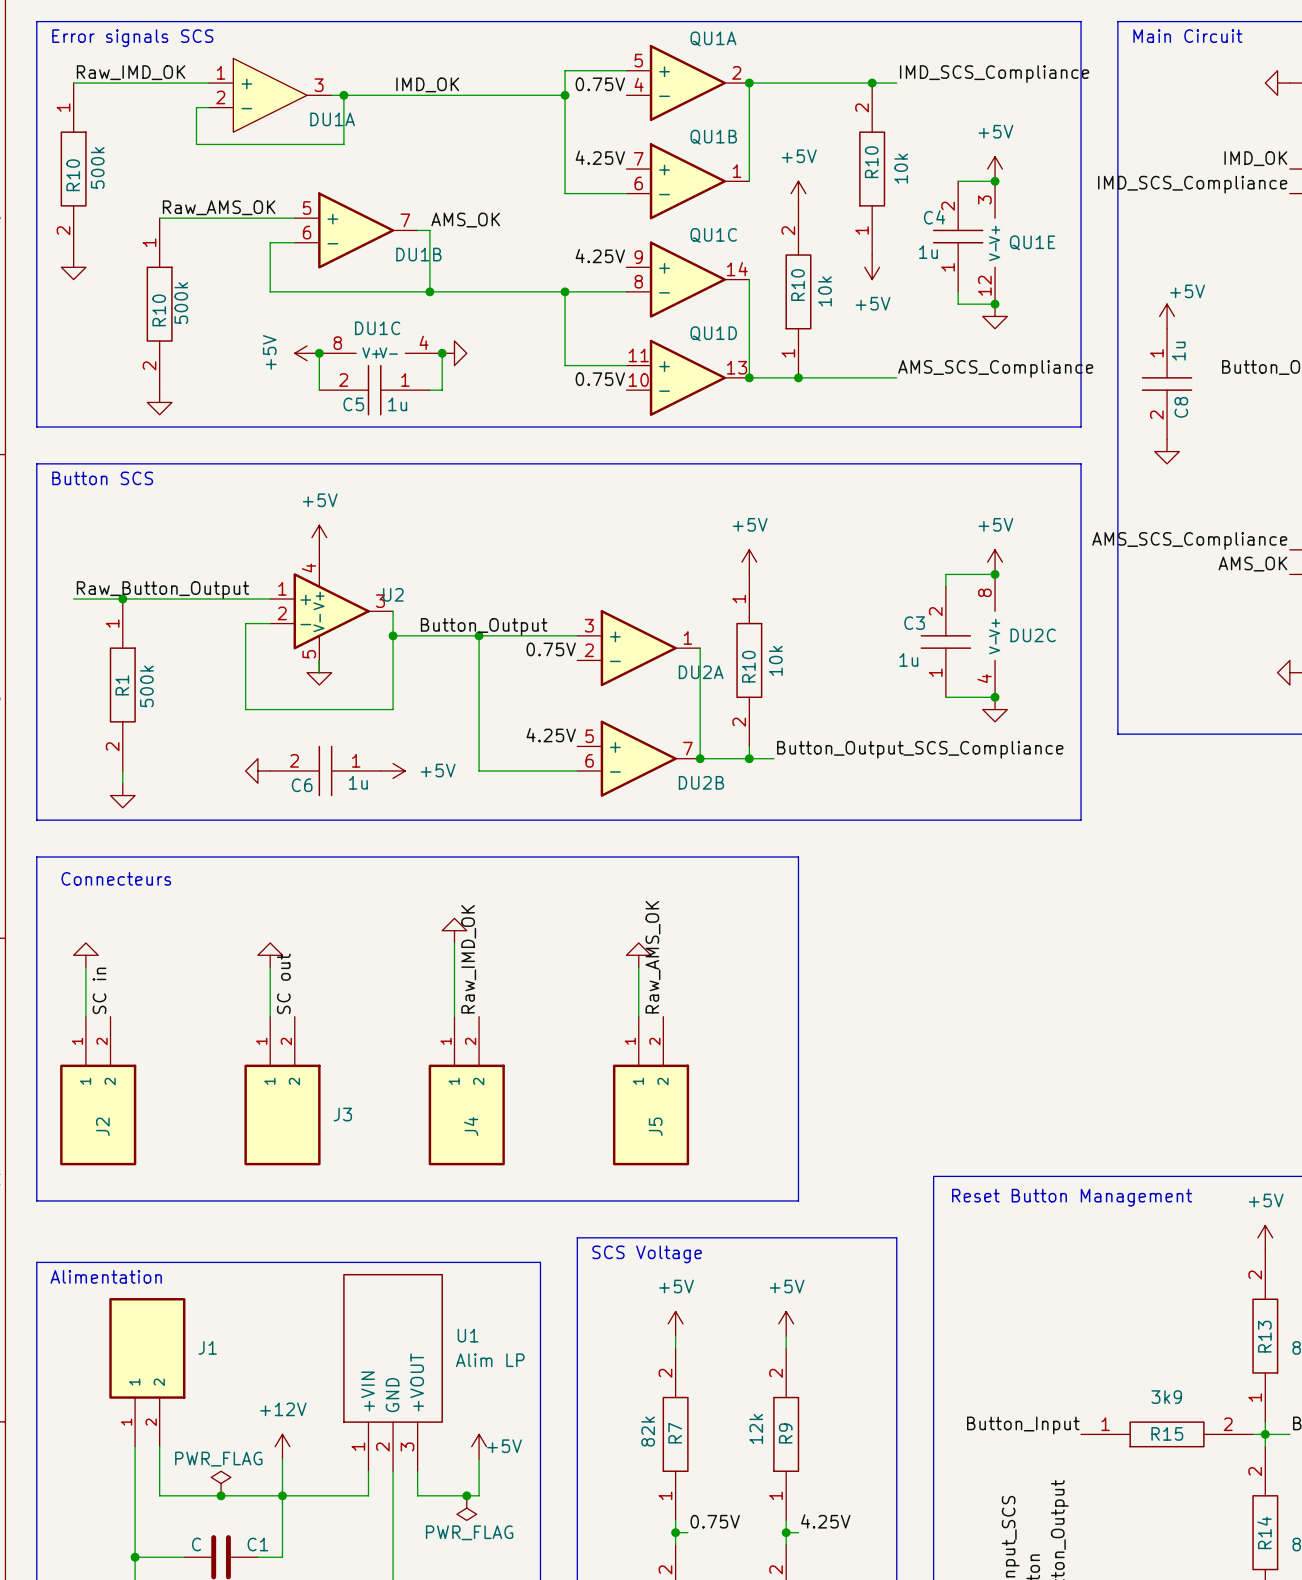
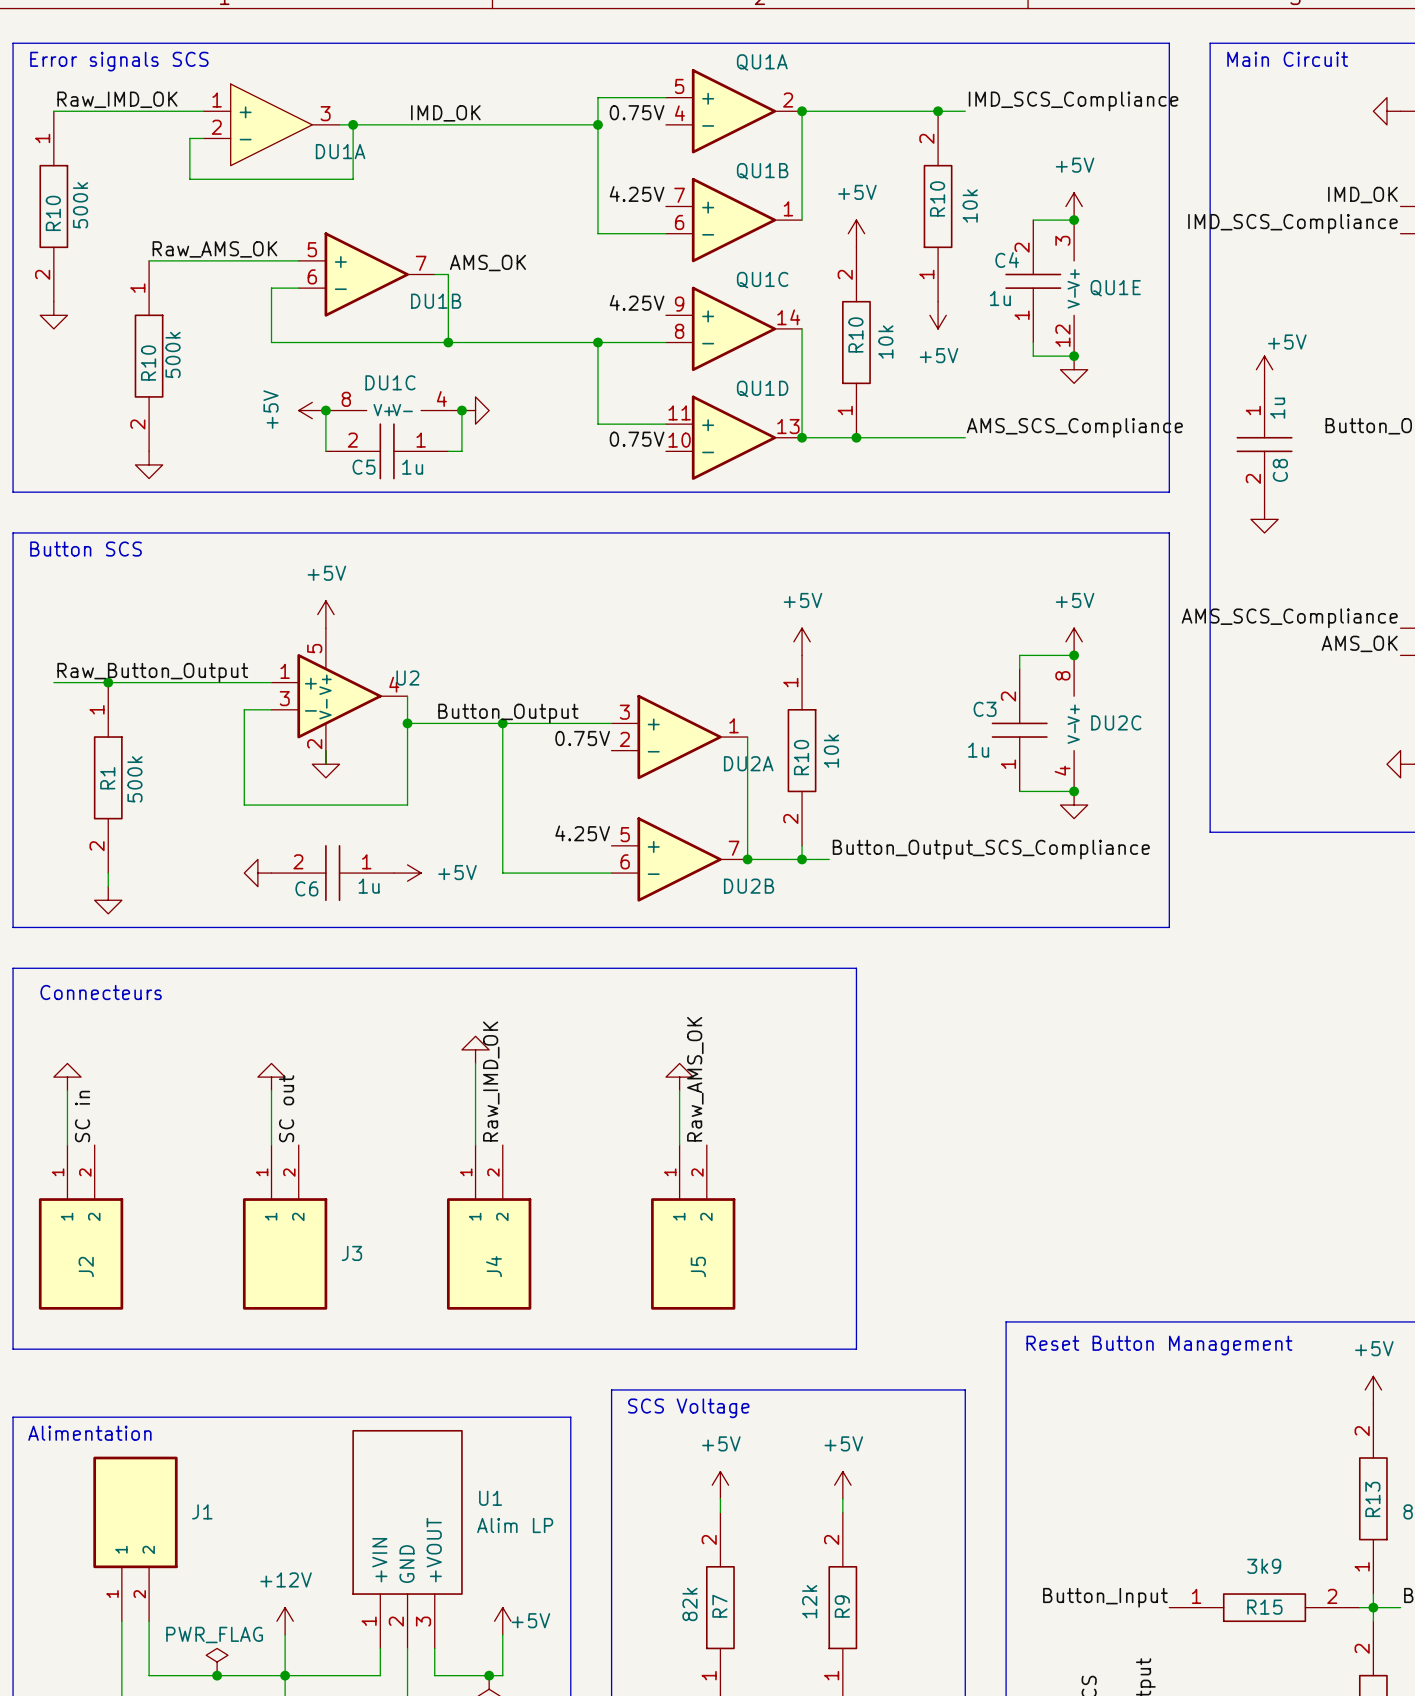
U2 pin number: 4 (308, 567) -> 5 (314, 648)
U2 pin number: 3 (380, 601) -> 4 (394, 684)
U2 pin number: 2 (282, 613) -> 3 (284, 698)
U2 pin number: 5 (309, 654) -> 2 (314, 744)

